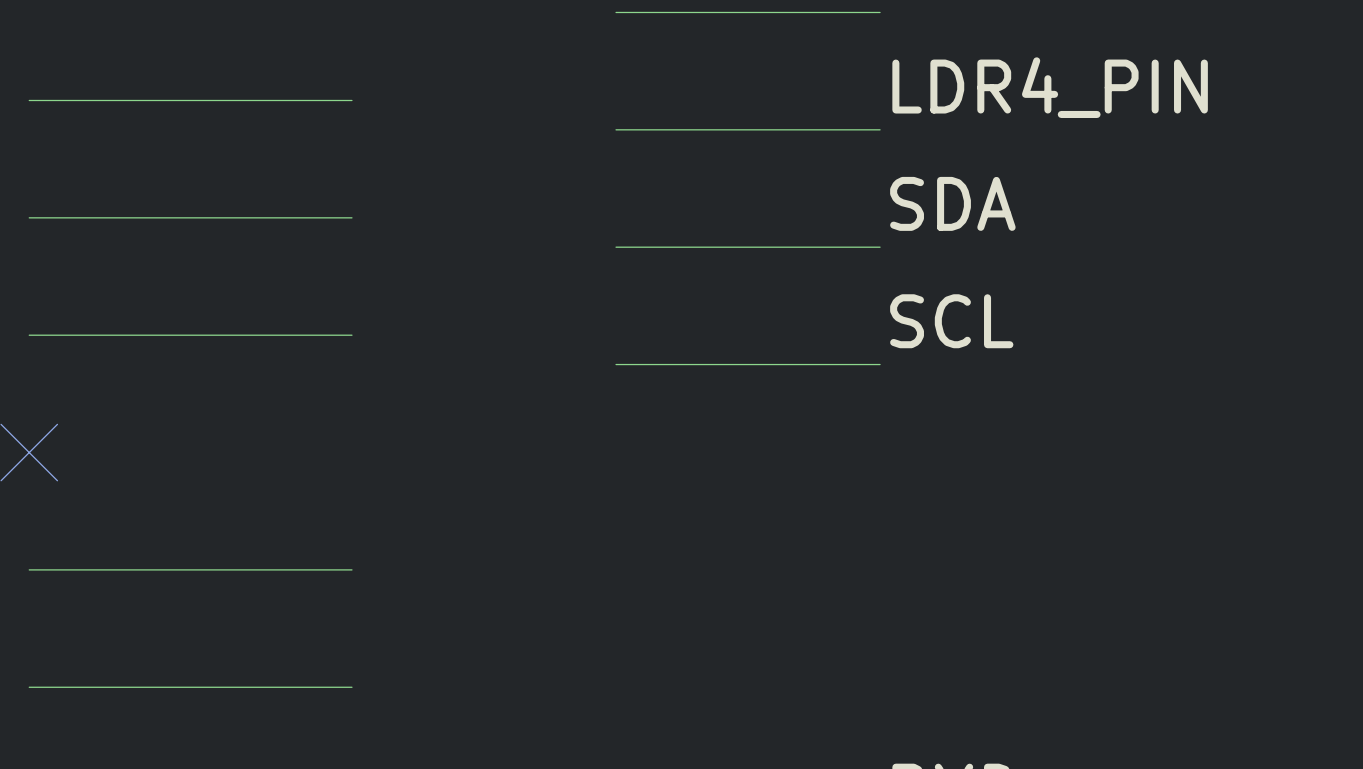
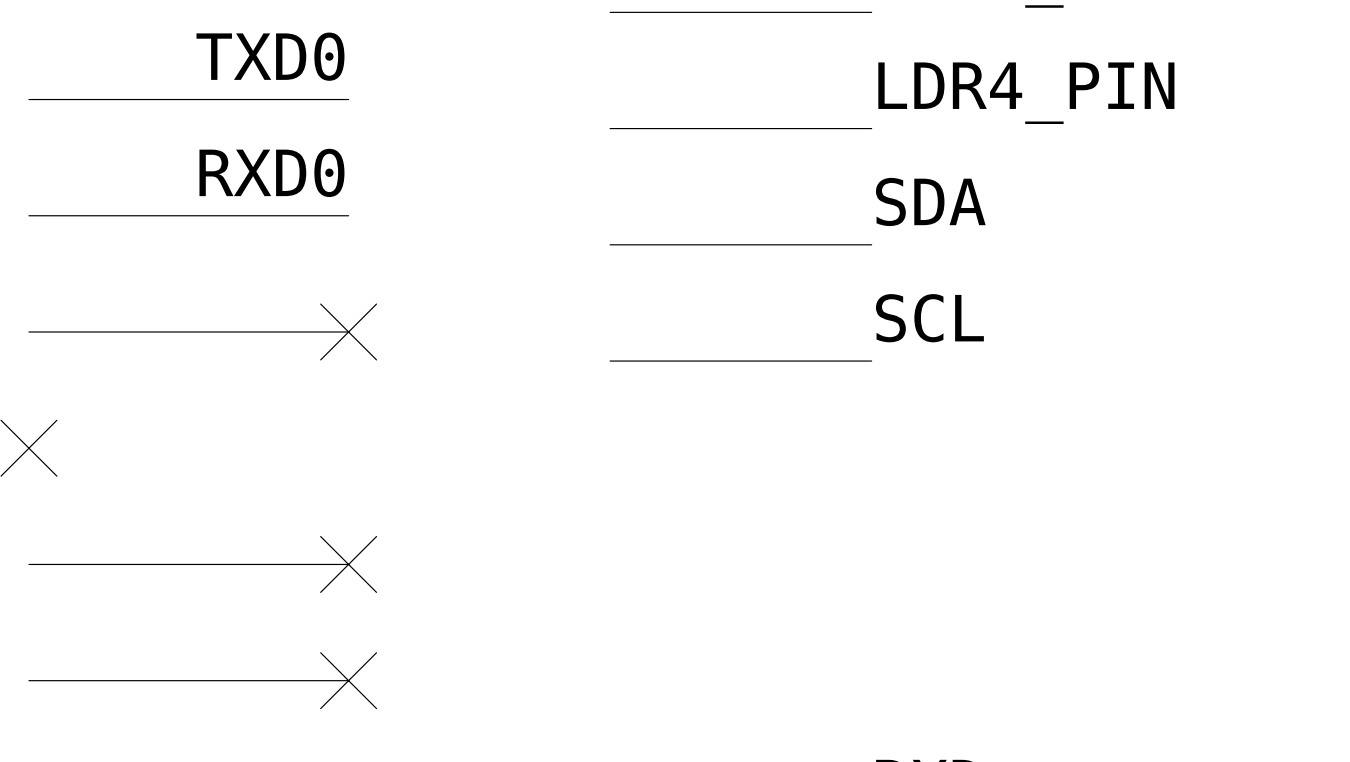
label: none -> TXD0 (270, 56)
label: none -> RXD0 (271, 172)
no-connect mark: none -> (348, 331)
no-connect mark: none -> (348, 564)
no-connect mark: none -> (348, 680)

